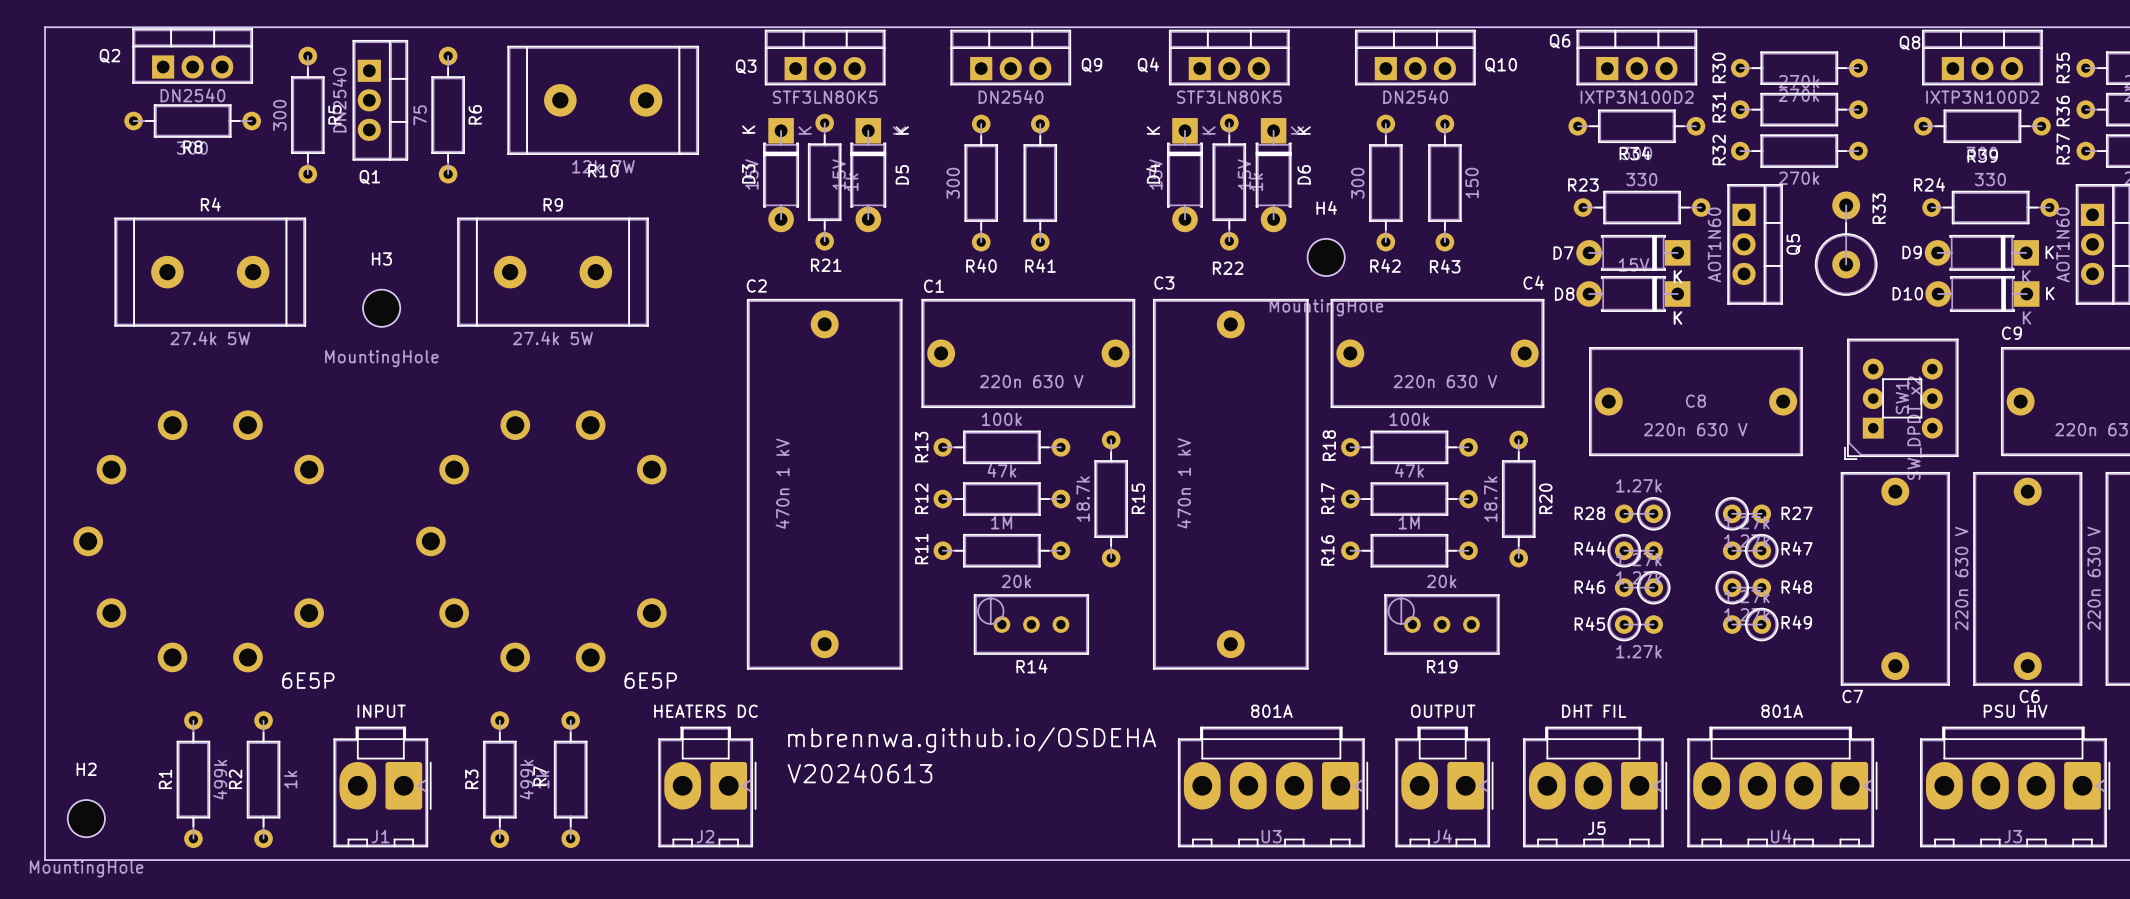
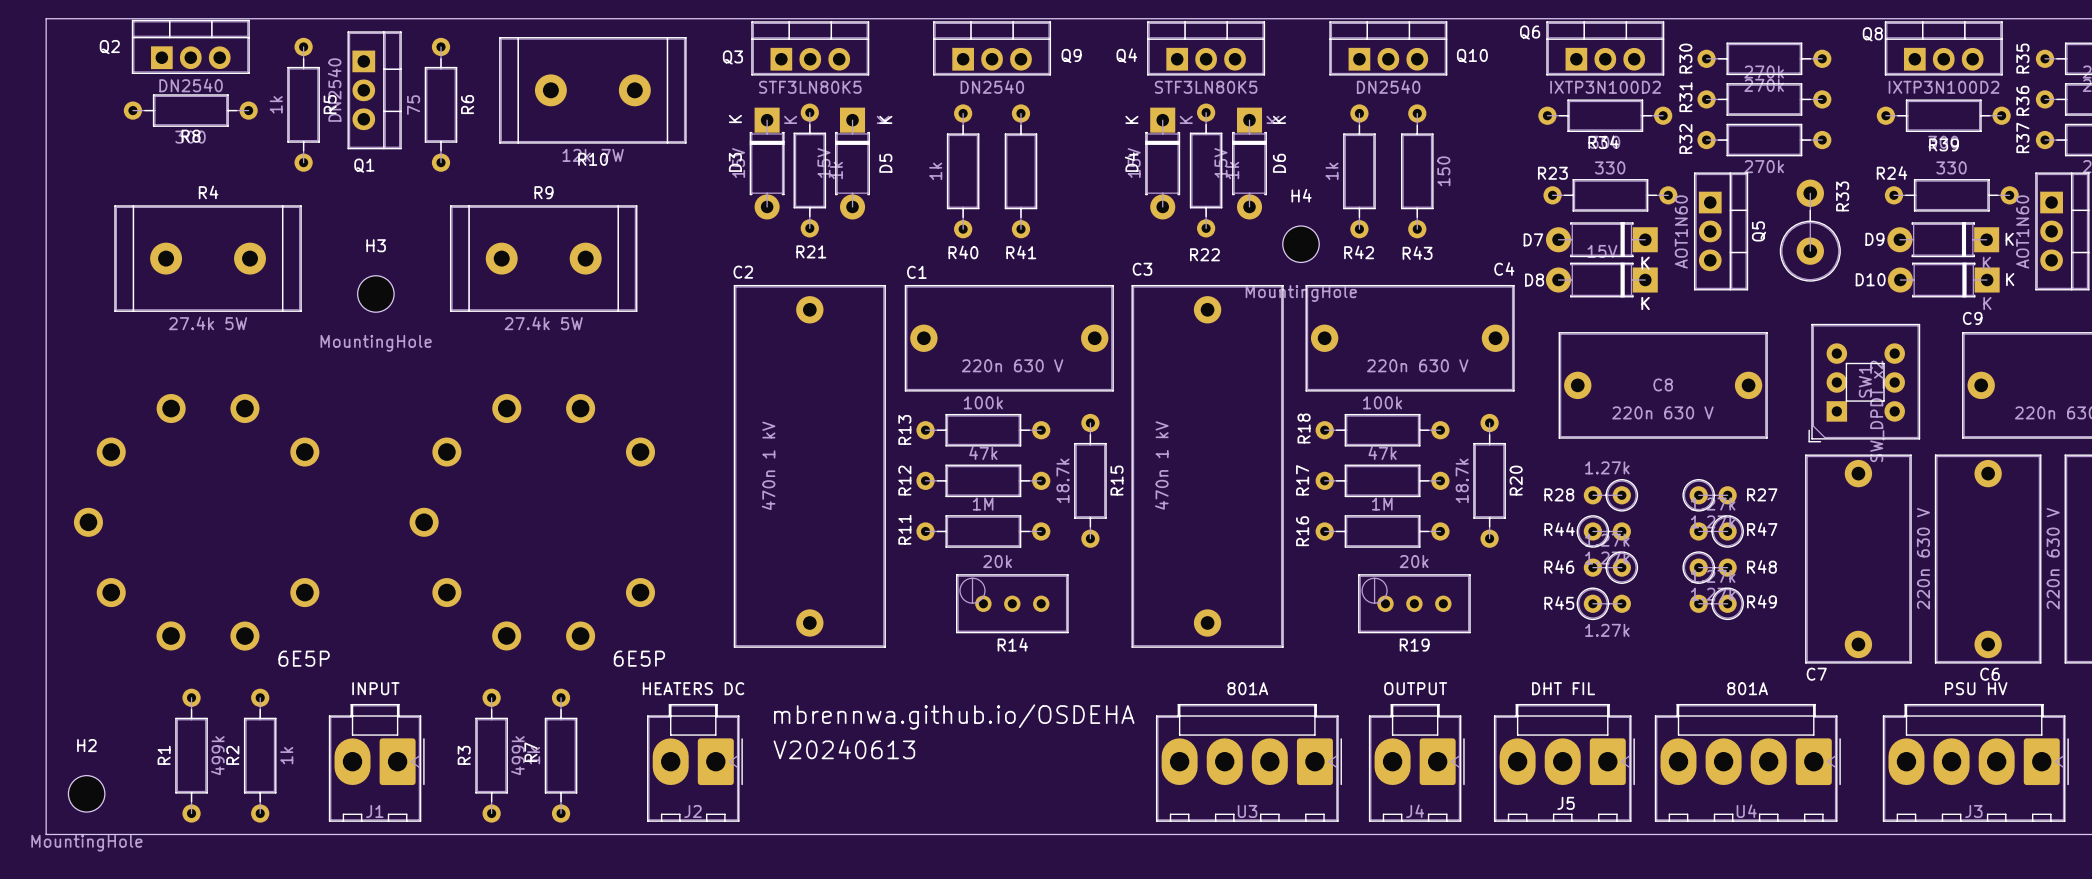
R5 value: 300 (279, 115) -> 1k (276, 104)
R40 value: 300 (953, 183) -> 1k (935, 171)
R42 value: 300 (1357, 183) -> 1k (1332, 171)

